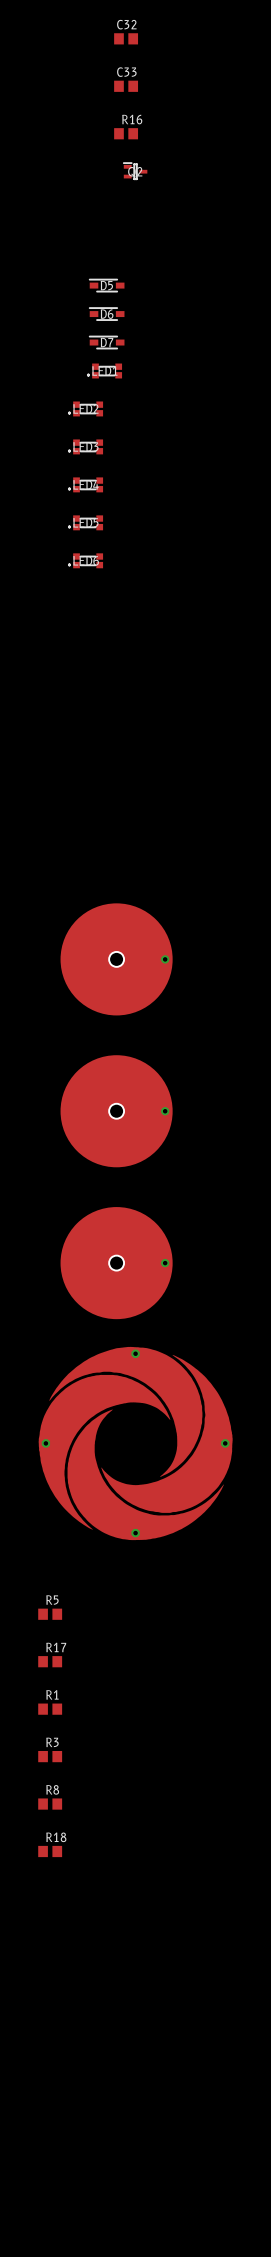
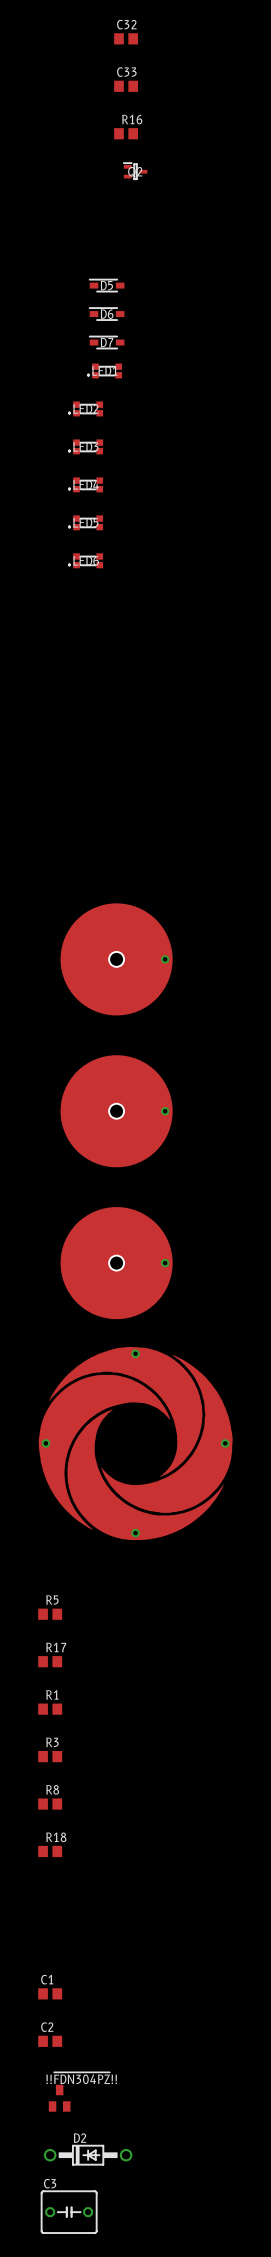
C1: none -> (50, 1993)
C2: none -> (50, 2041)
!!~{FDN304PZ}!!: none -> (59, 2098)
D2: none -> (88, 2155)
C3: none -> (69, 2212)

